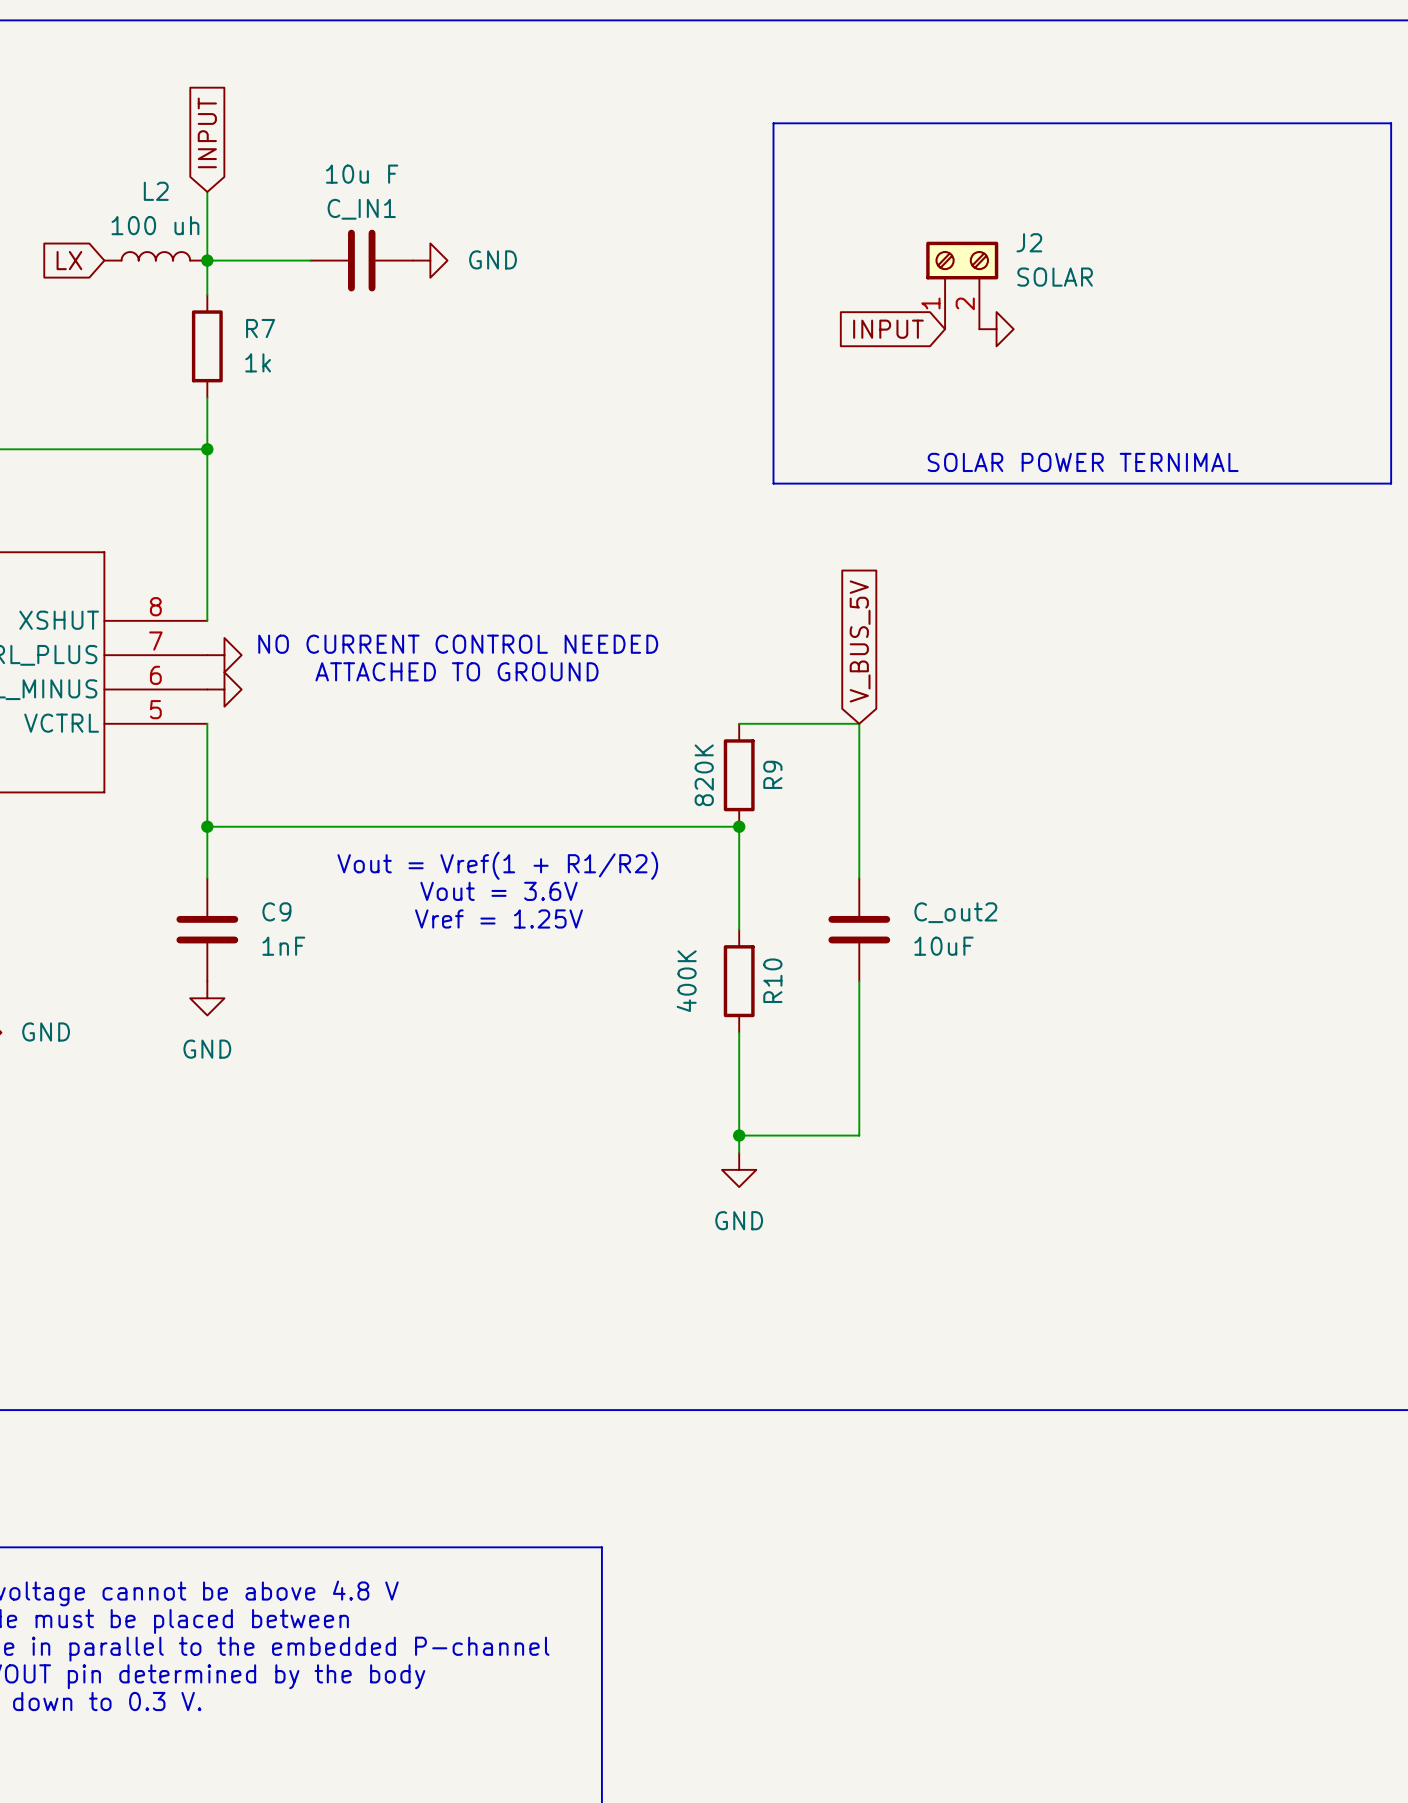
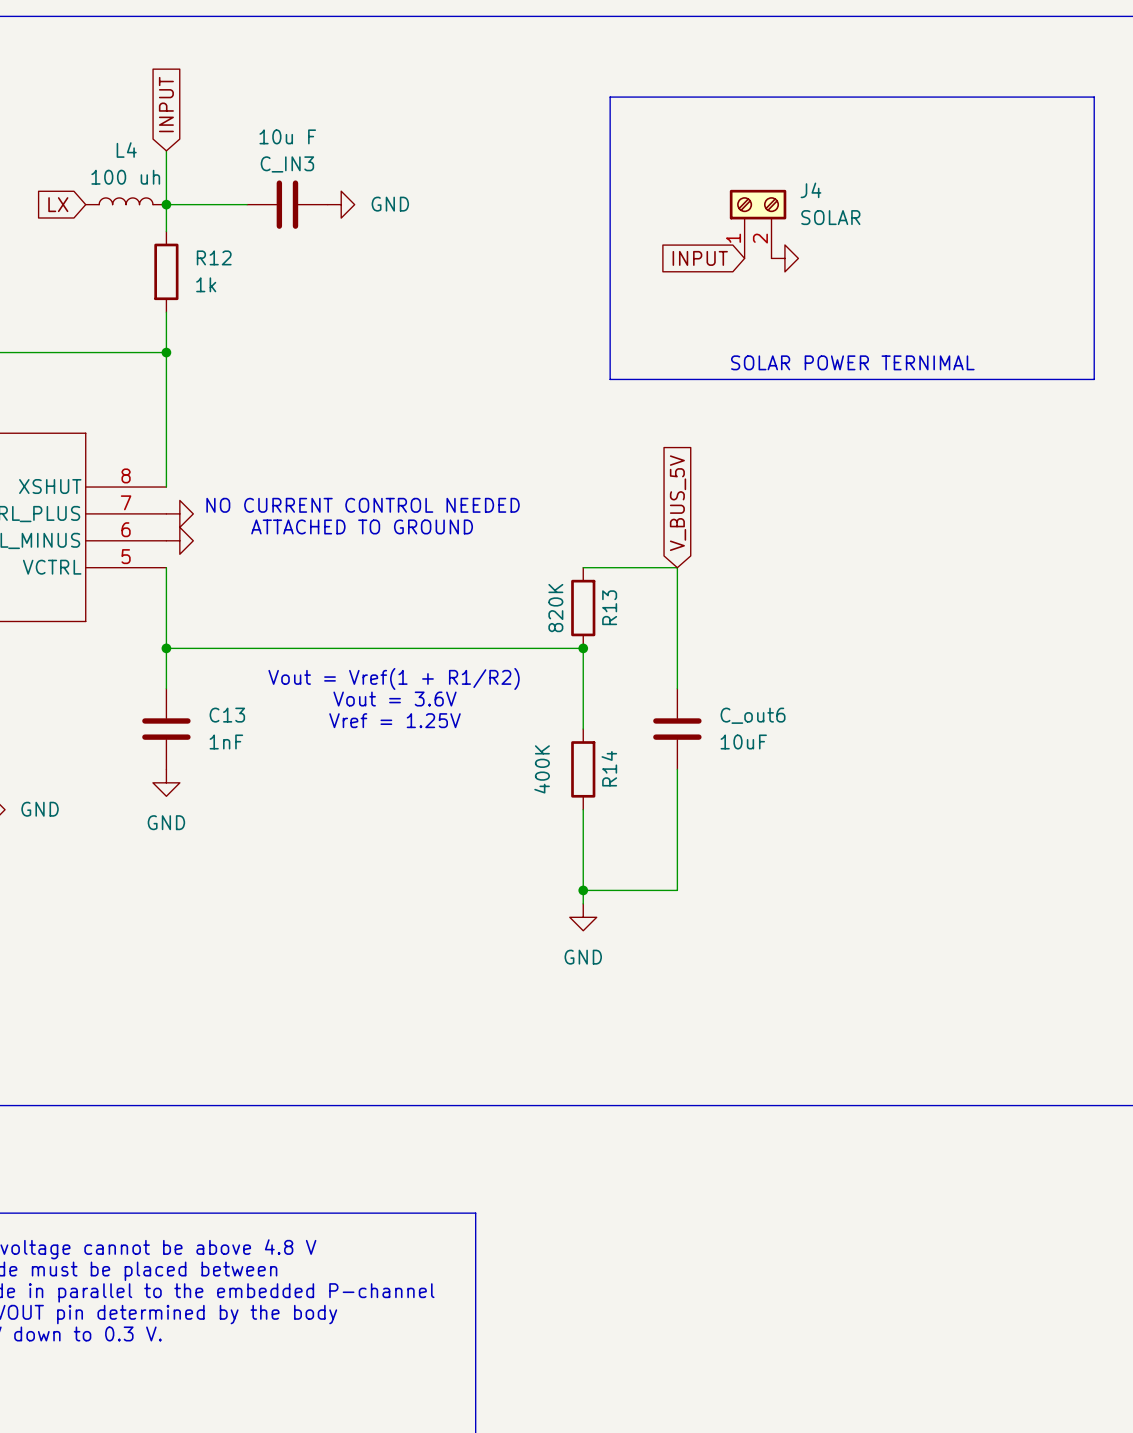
L2 name: L2 (156, 191) -> L4 (126, 150)
C_IN1 name: C_IN1 (361, 209) -> C_IN3 (287, 164)
J2 name: J2 (1029, 242) -> J4 (810, 190)
R7 name: R7 (260, 328) -> R12 (214, 257)
R9 name: R9 (772, 774) -> R13 (609, 607)
C9 name: C9 (276, 911) -> C13 (227, 715)
C_out2 name: C_out2 (955, 912) -> C_out6 (753, 715)
R10 name: R10 (772, 980) -> R14 (609, 768)

